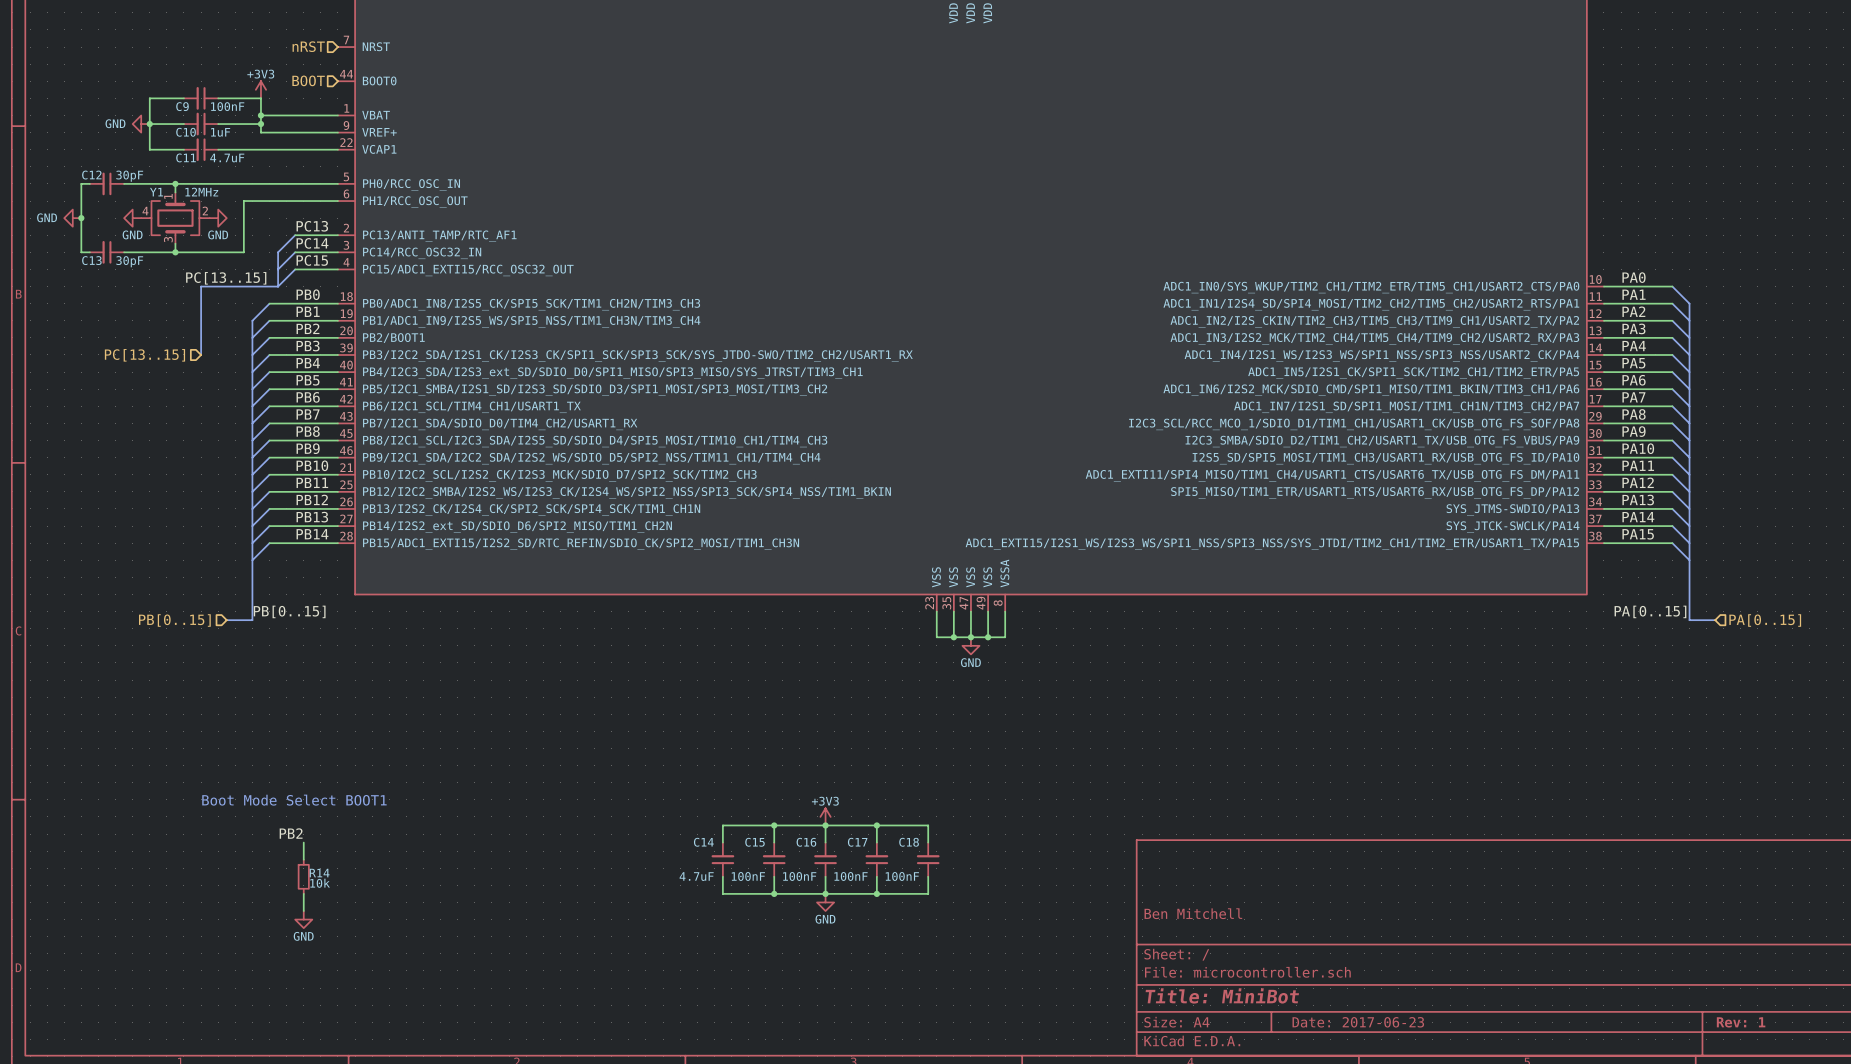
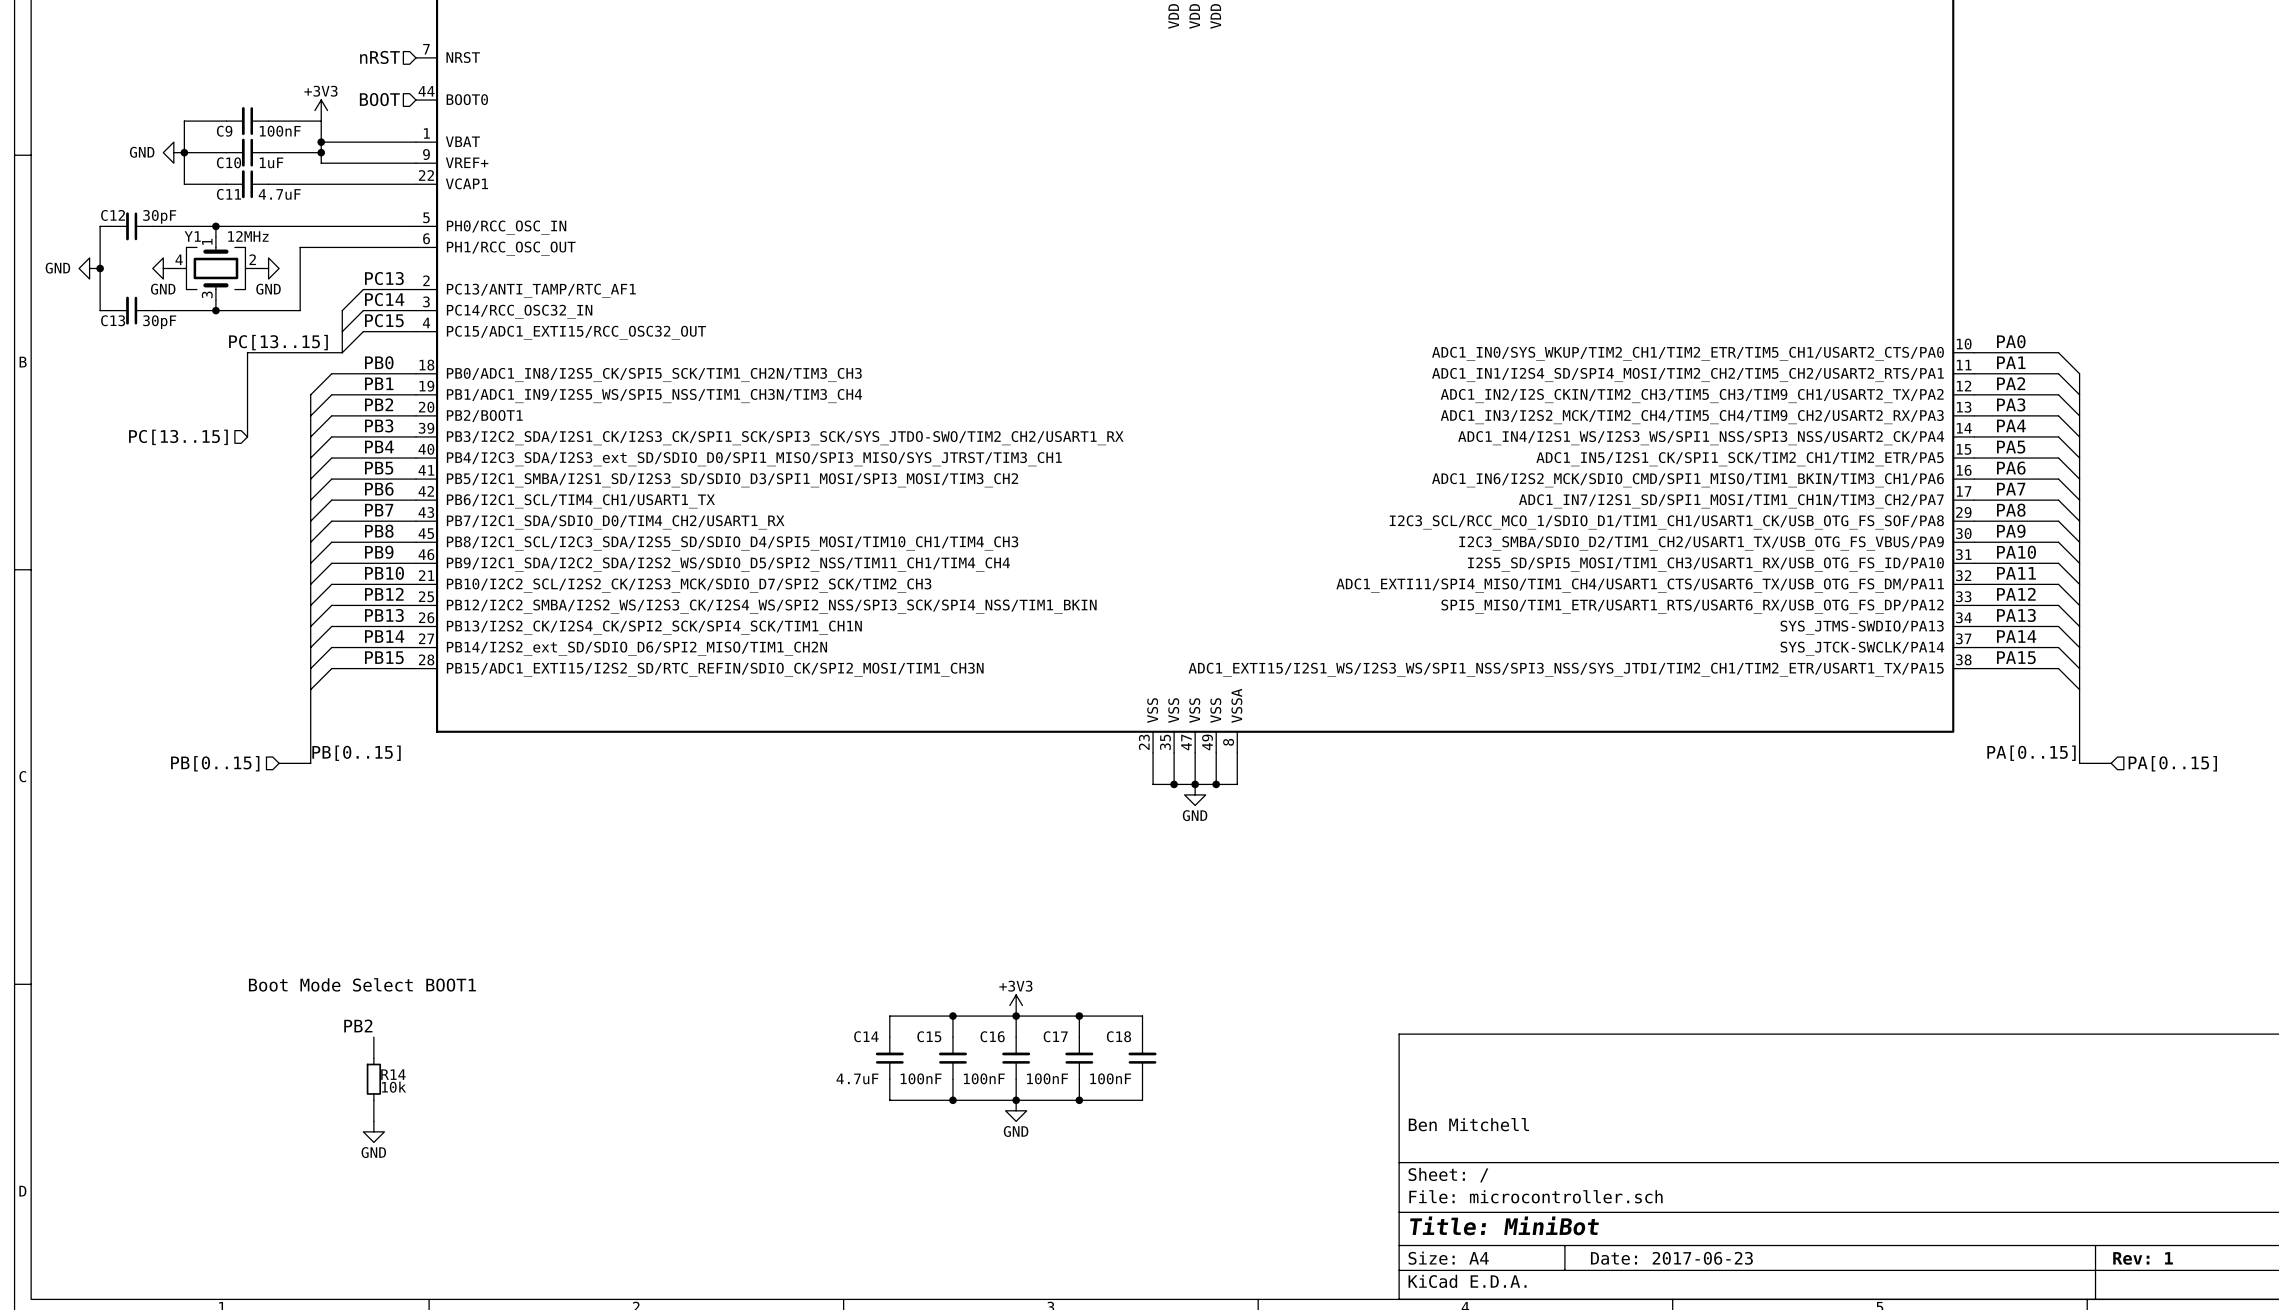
label: PB11 (312, 482) -> PB12 (384, 594)
label: PB12 (312, 499) -> PB13 (384, 615)
label: PB13 (312, 517) -> PB14 (384, 636)
label: PB14 (312, 534) -> PB15 (384, 657)

